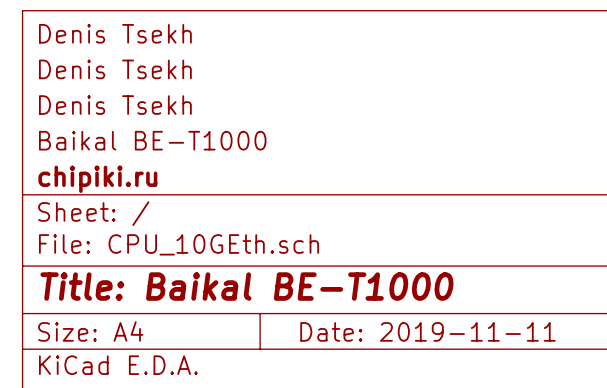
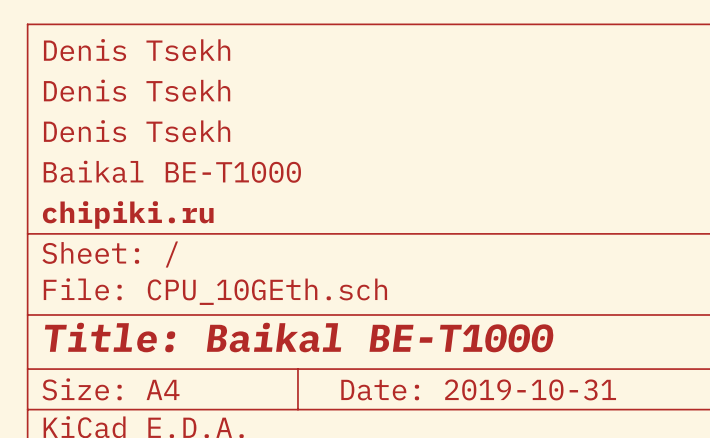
title block: Date: 2019-11-11 (428, 331) -> Date: 2019-10-31 (478, 389)

